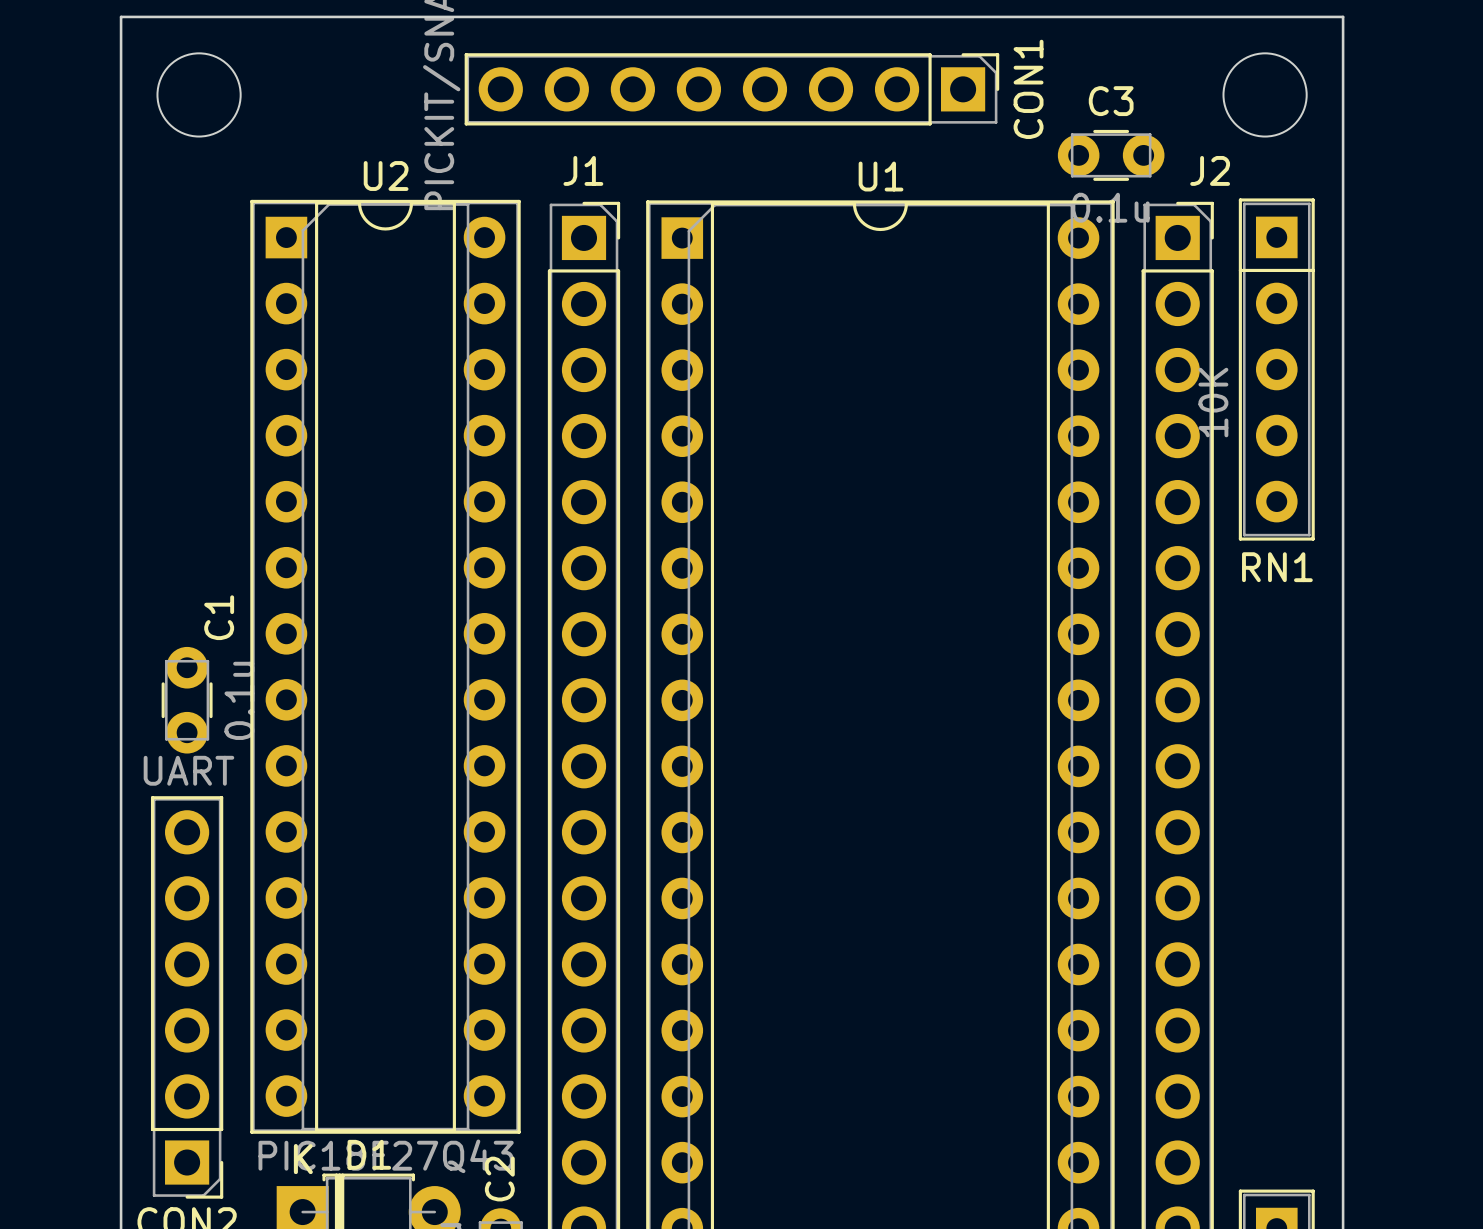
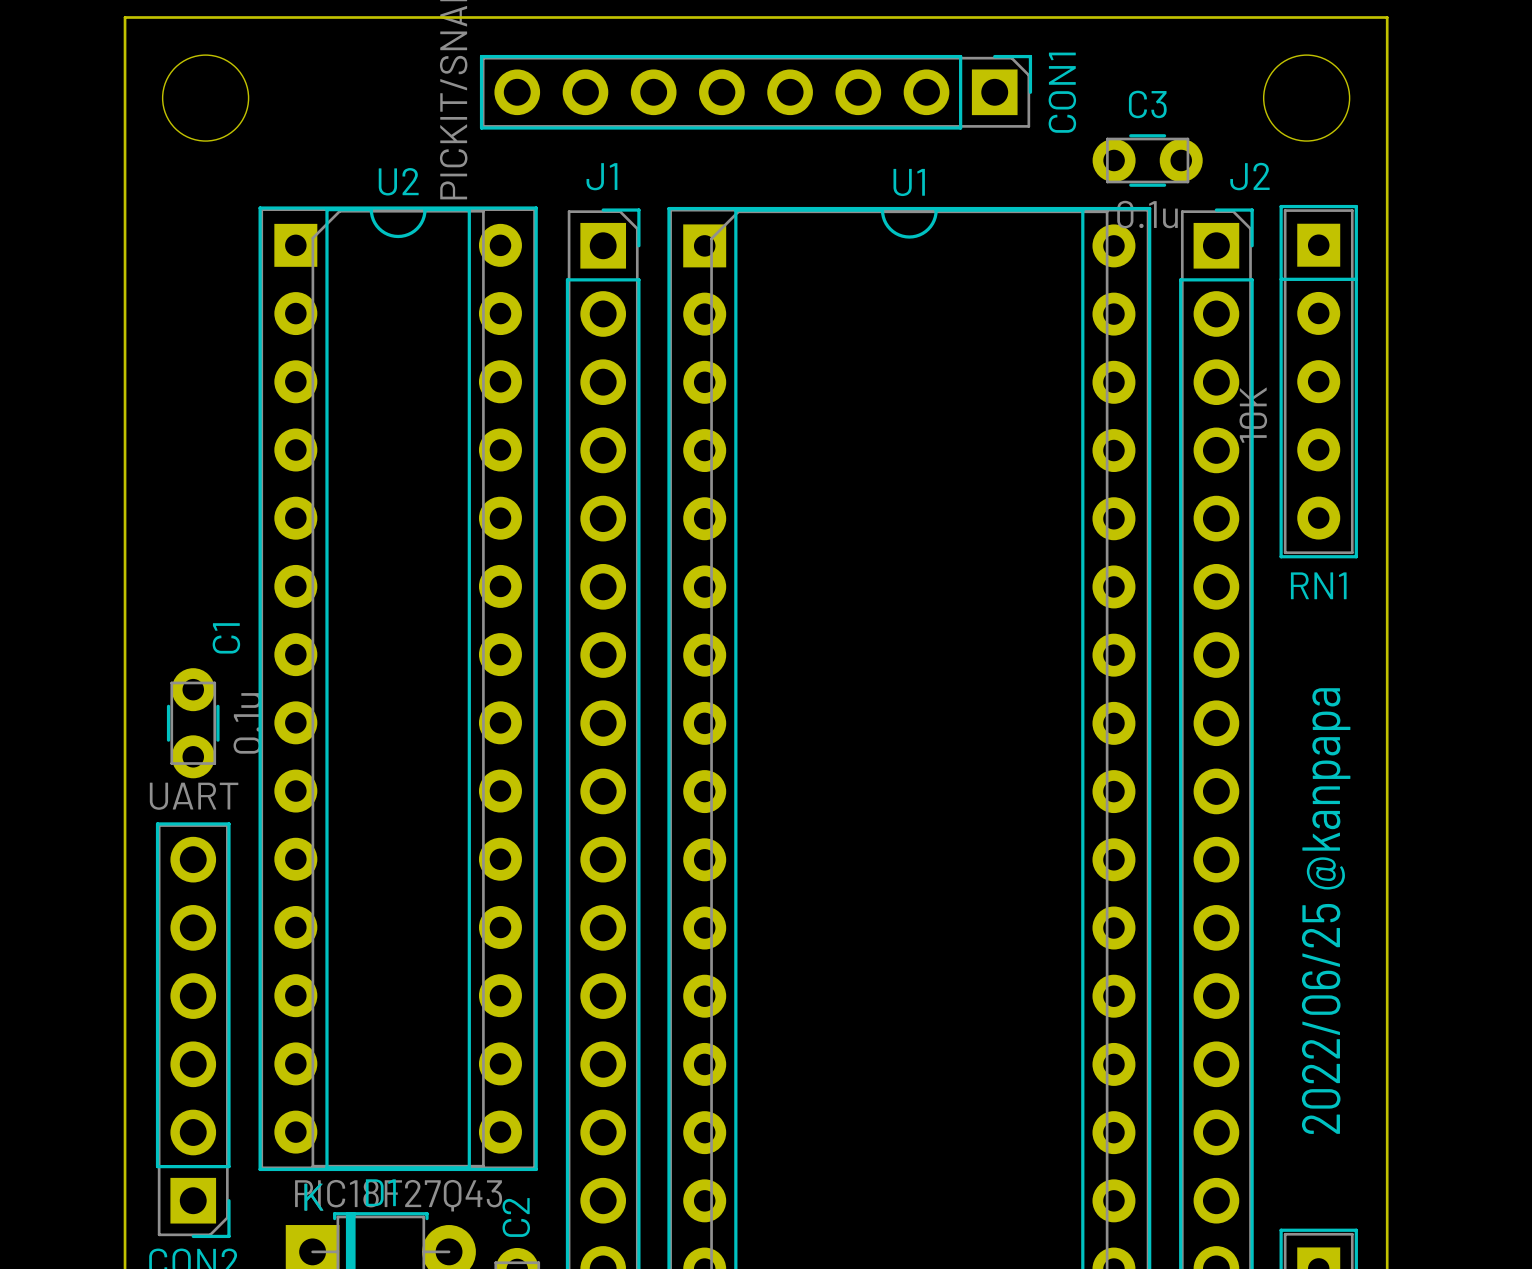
text: none -> 2022/06/25 @kanpapa (1326, 911)

